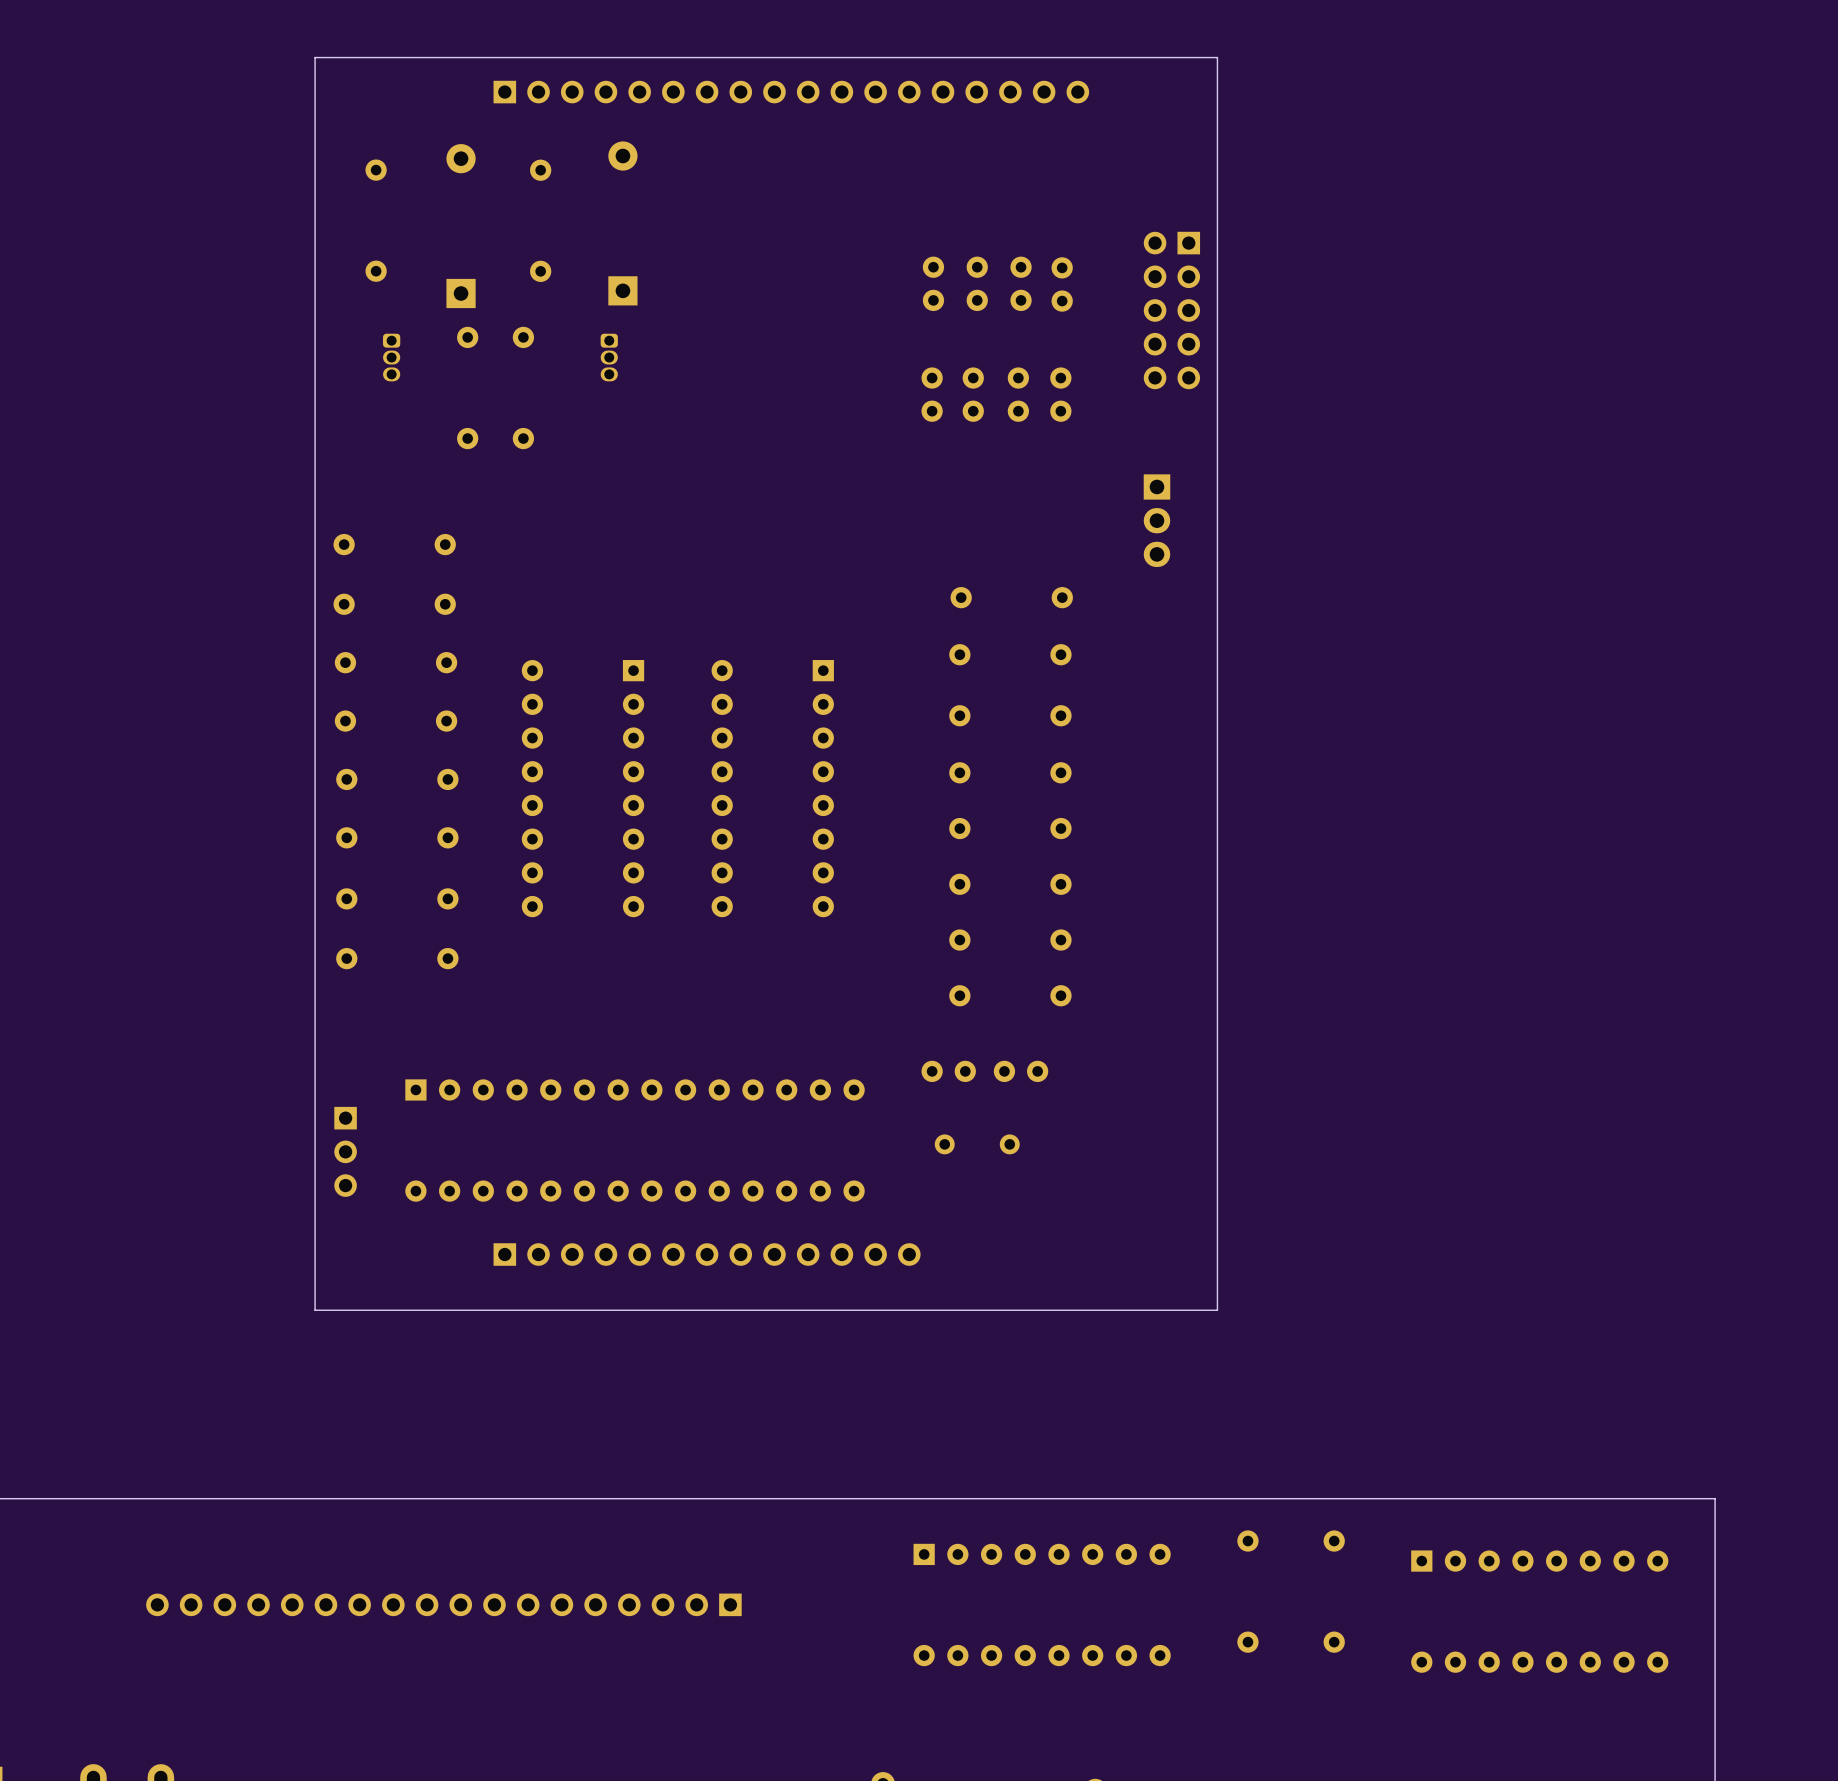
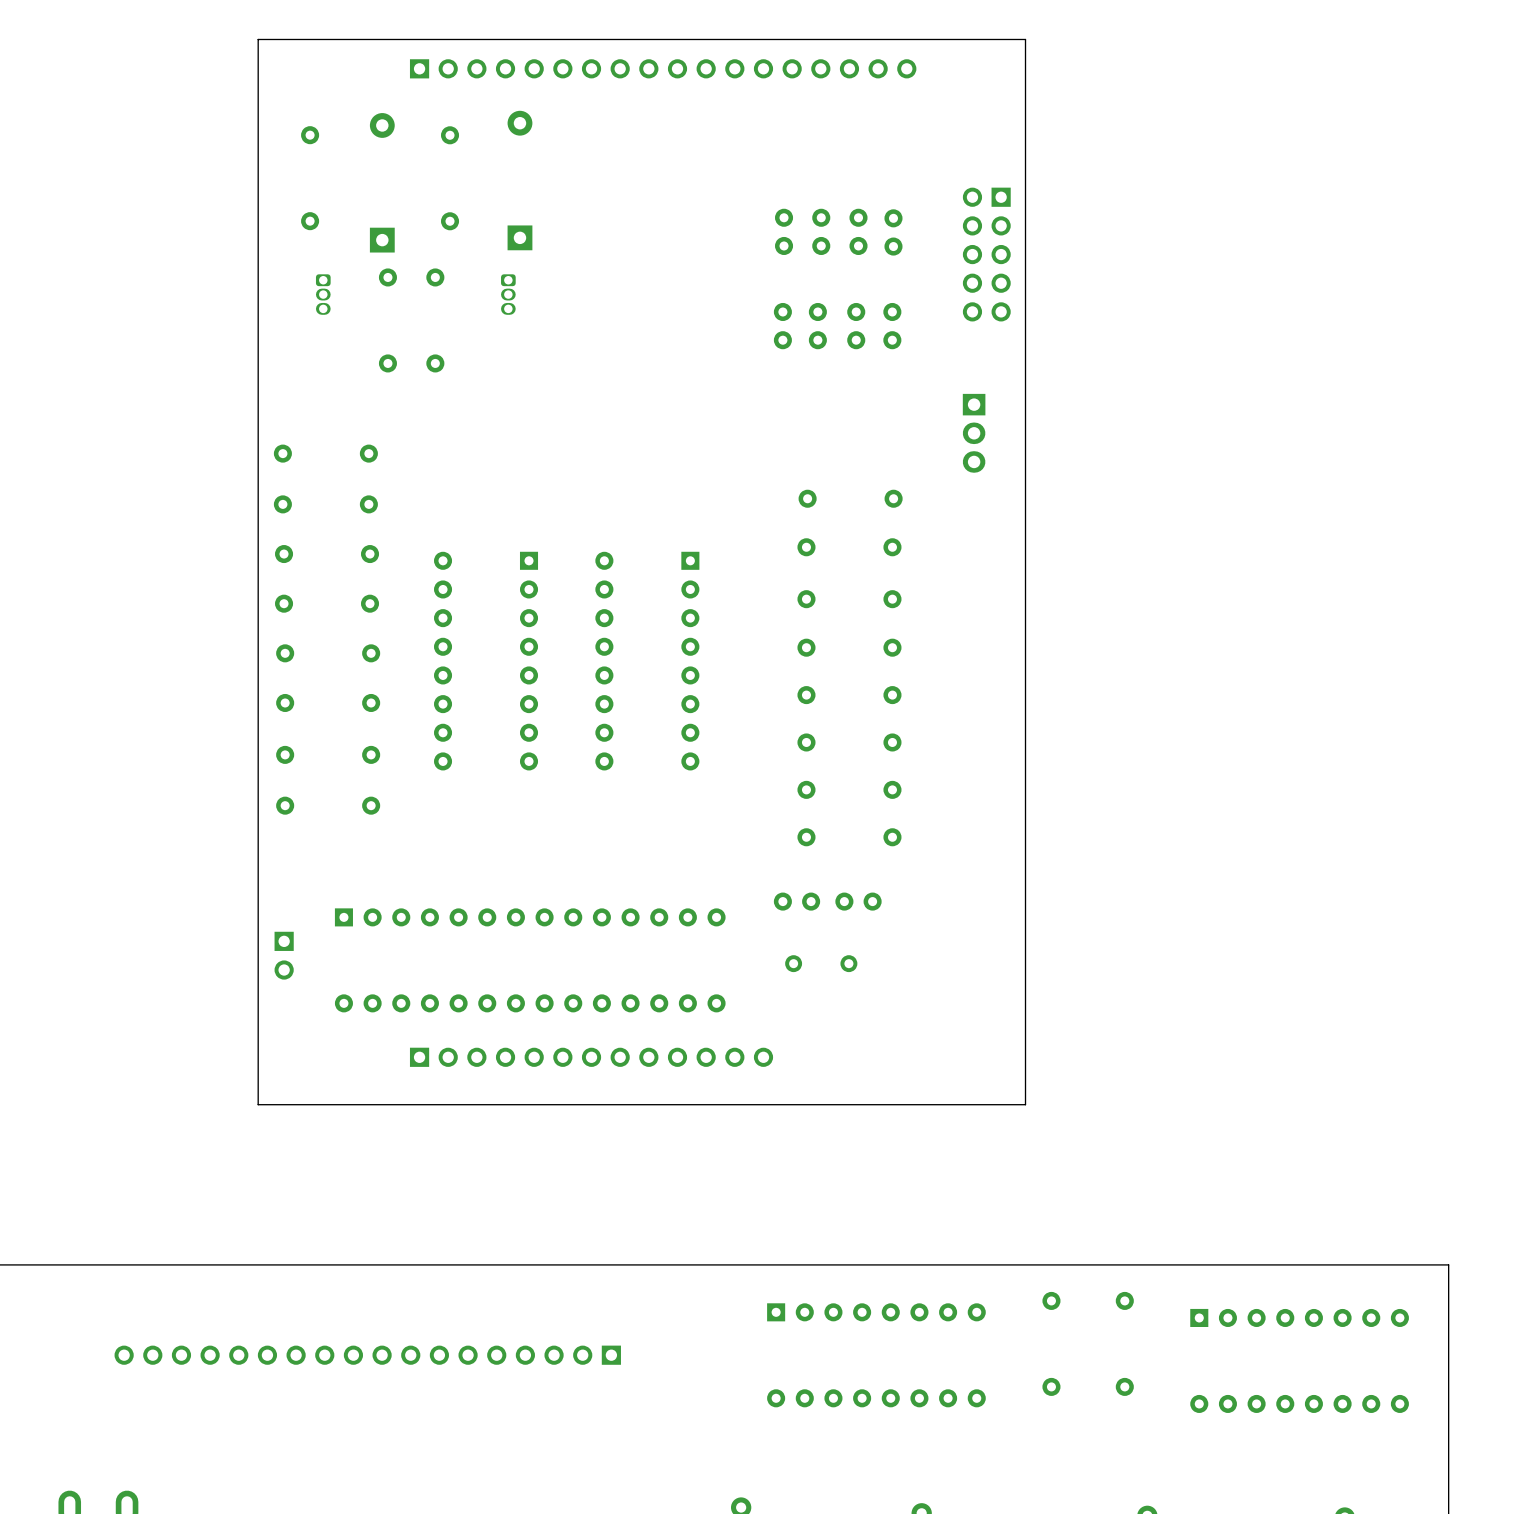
part: (345, 1151) -> none

